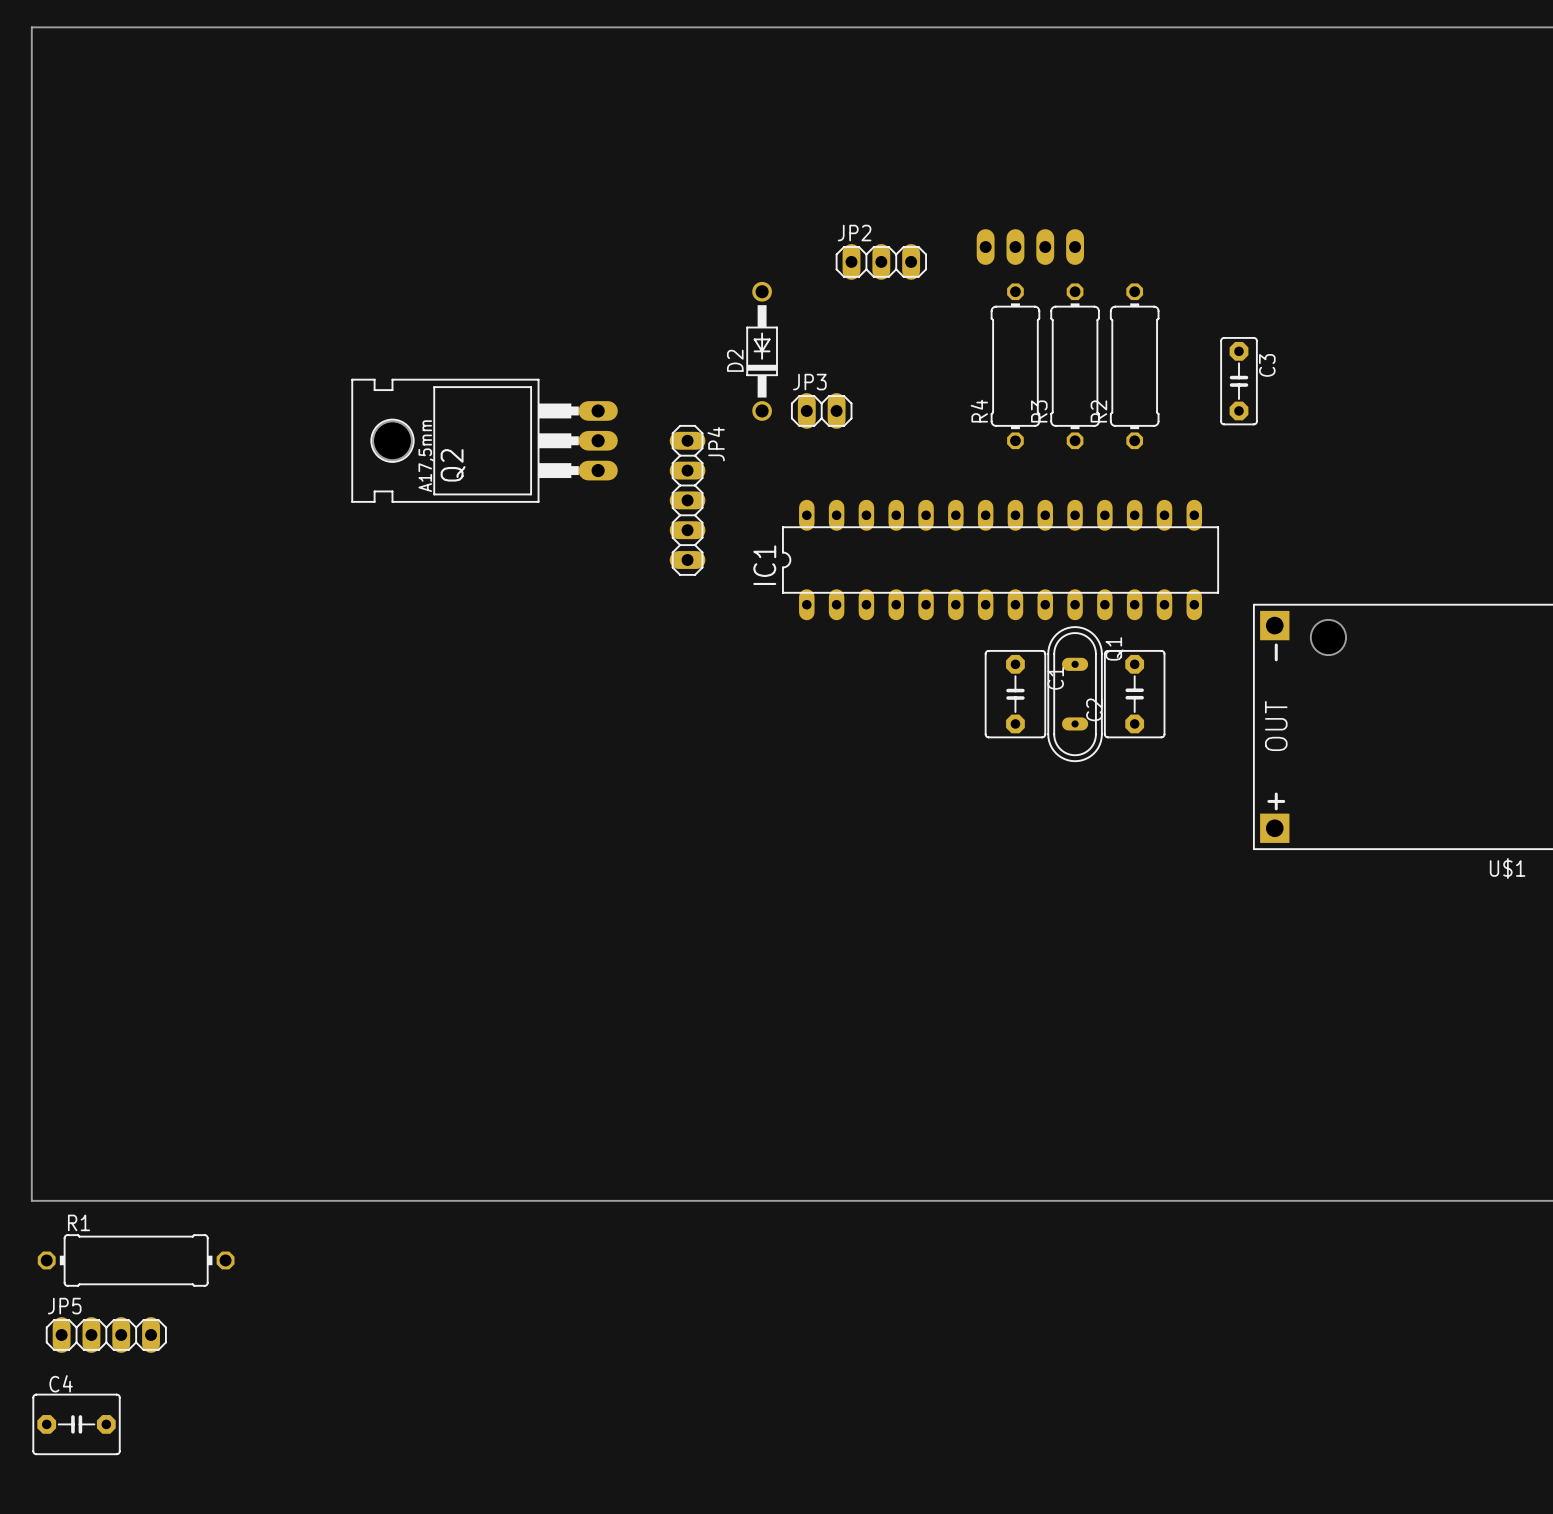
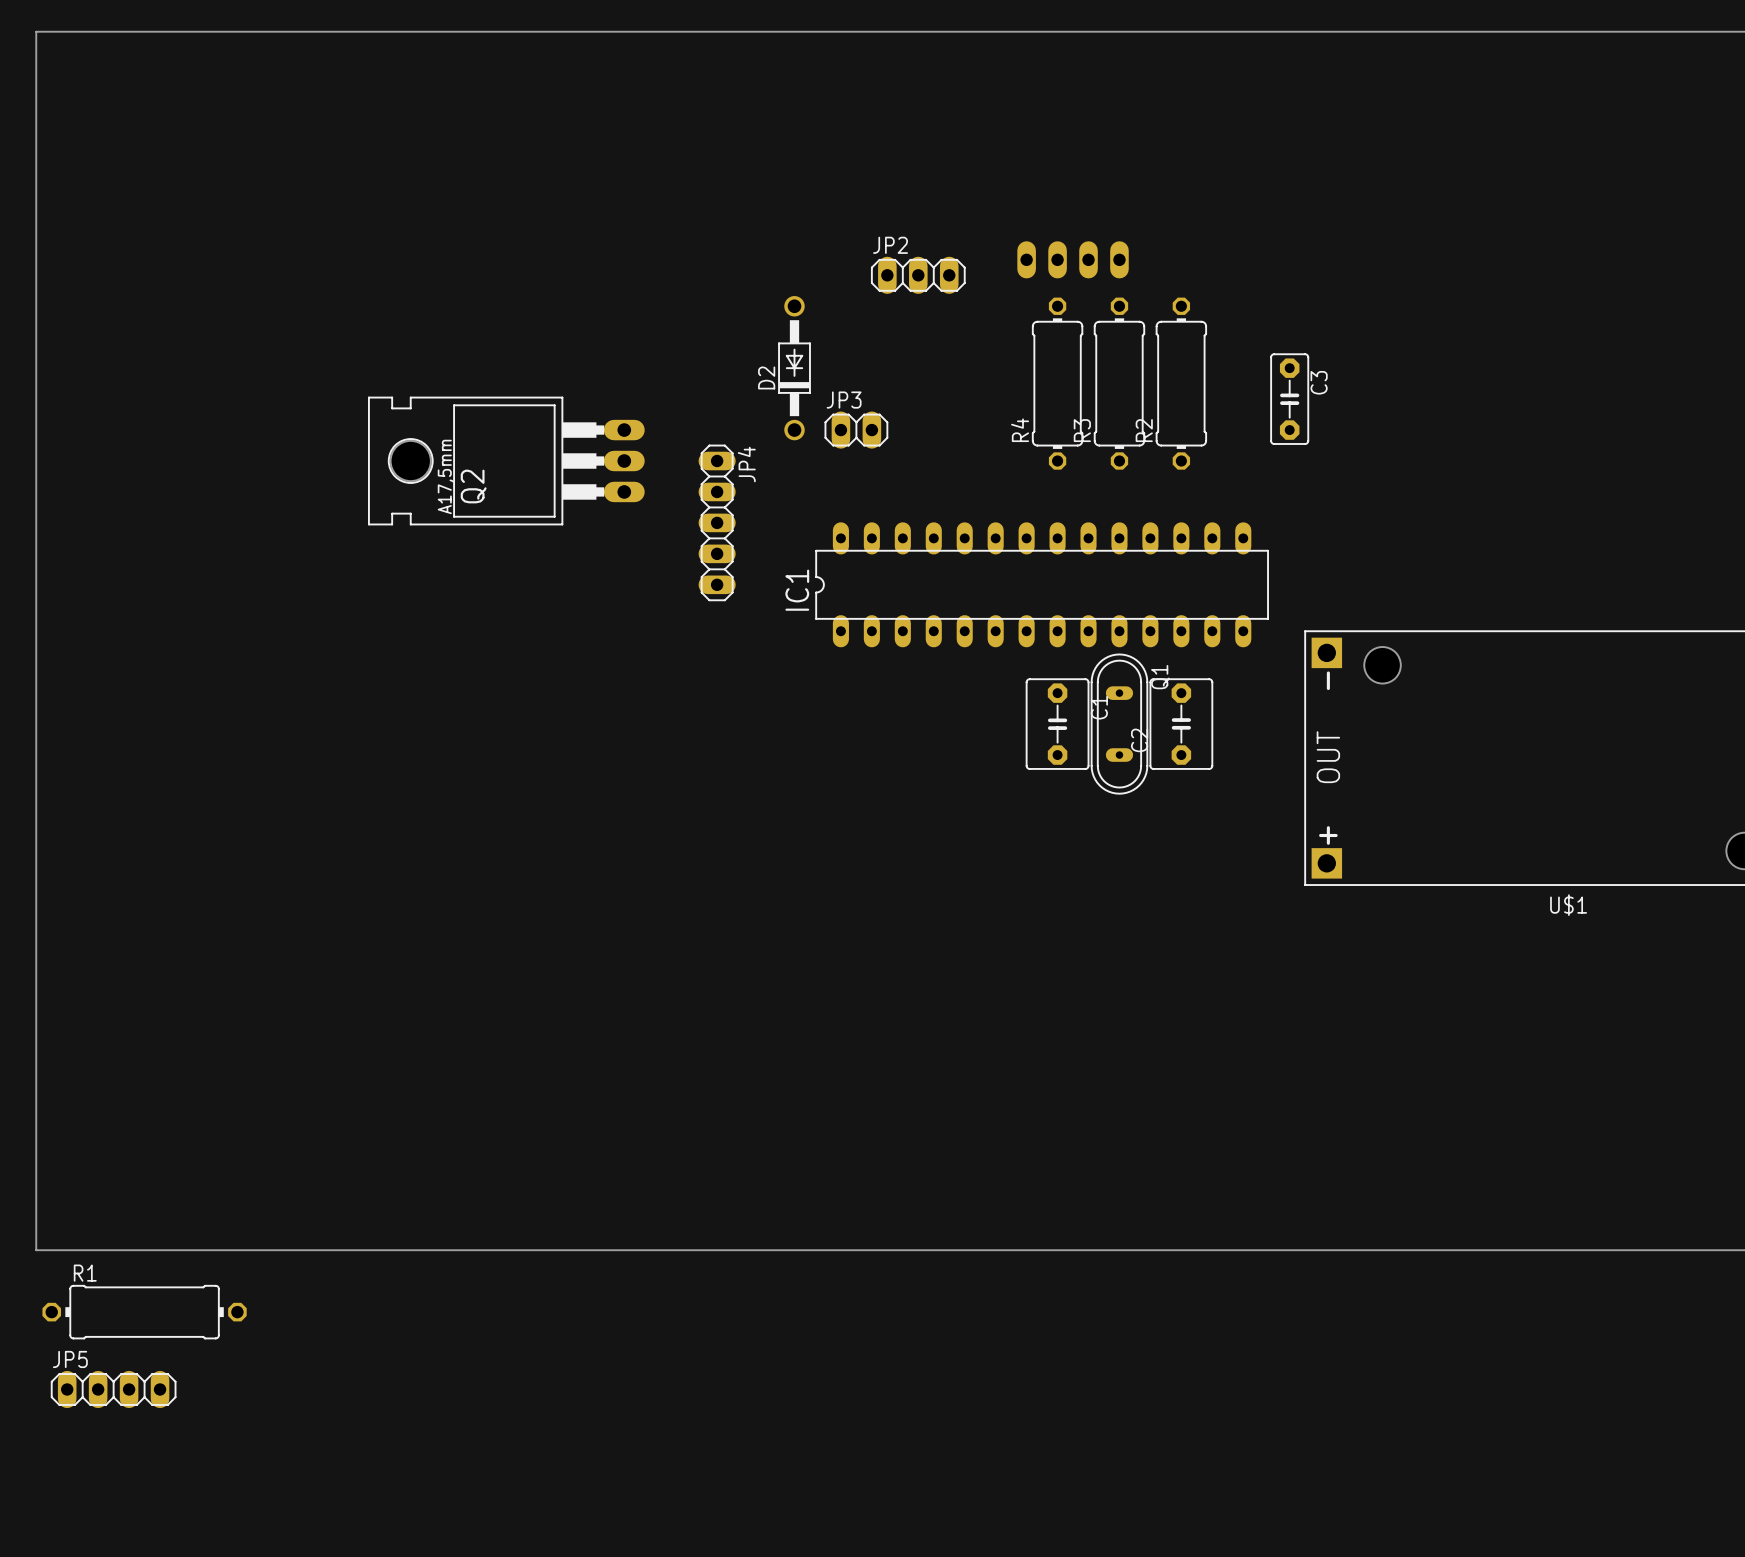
C4: (76, 1424) -> none

